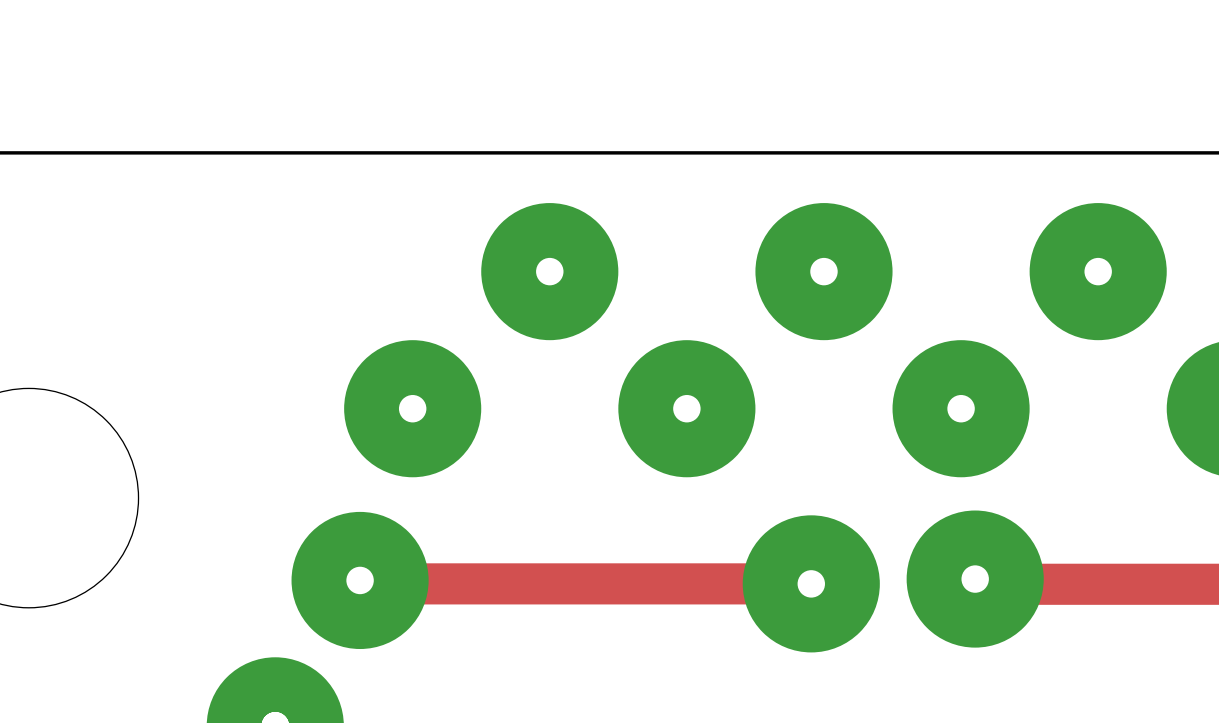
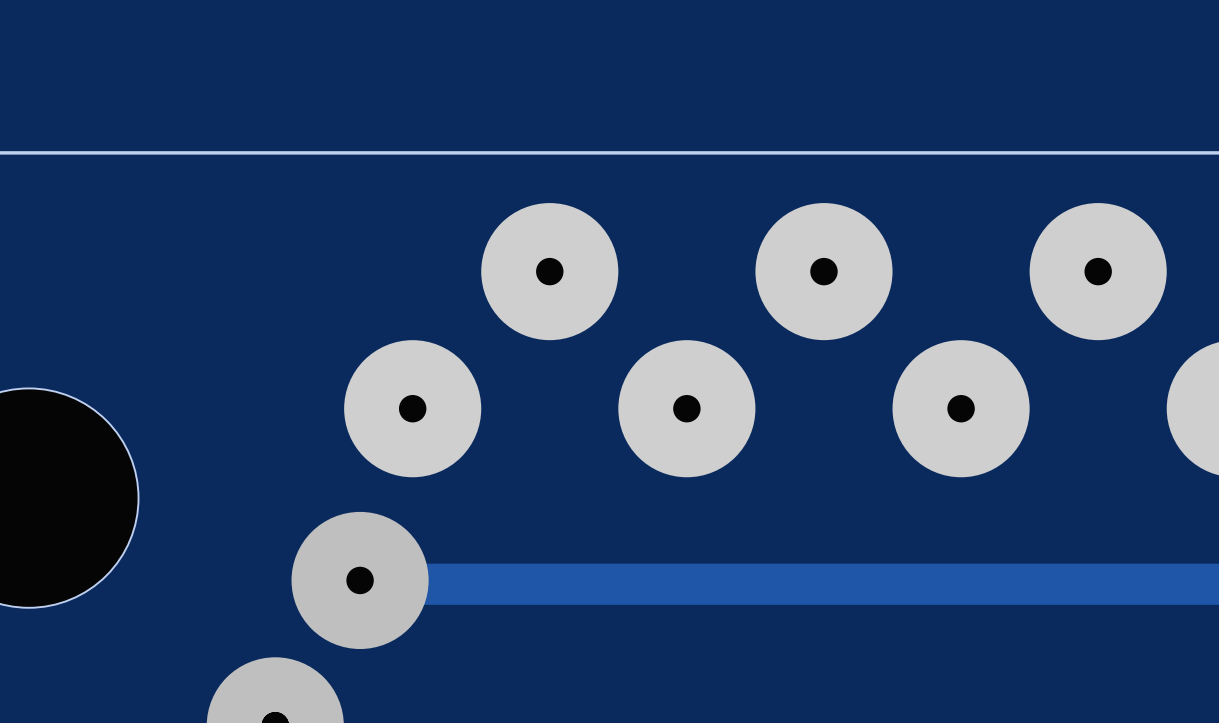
via: (975, 579) -> none
track: (363, 583) (811, 583) -> (363, 584) (980, 584)
via: (811, 583) -> none

